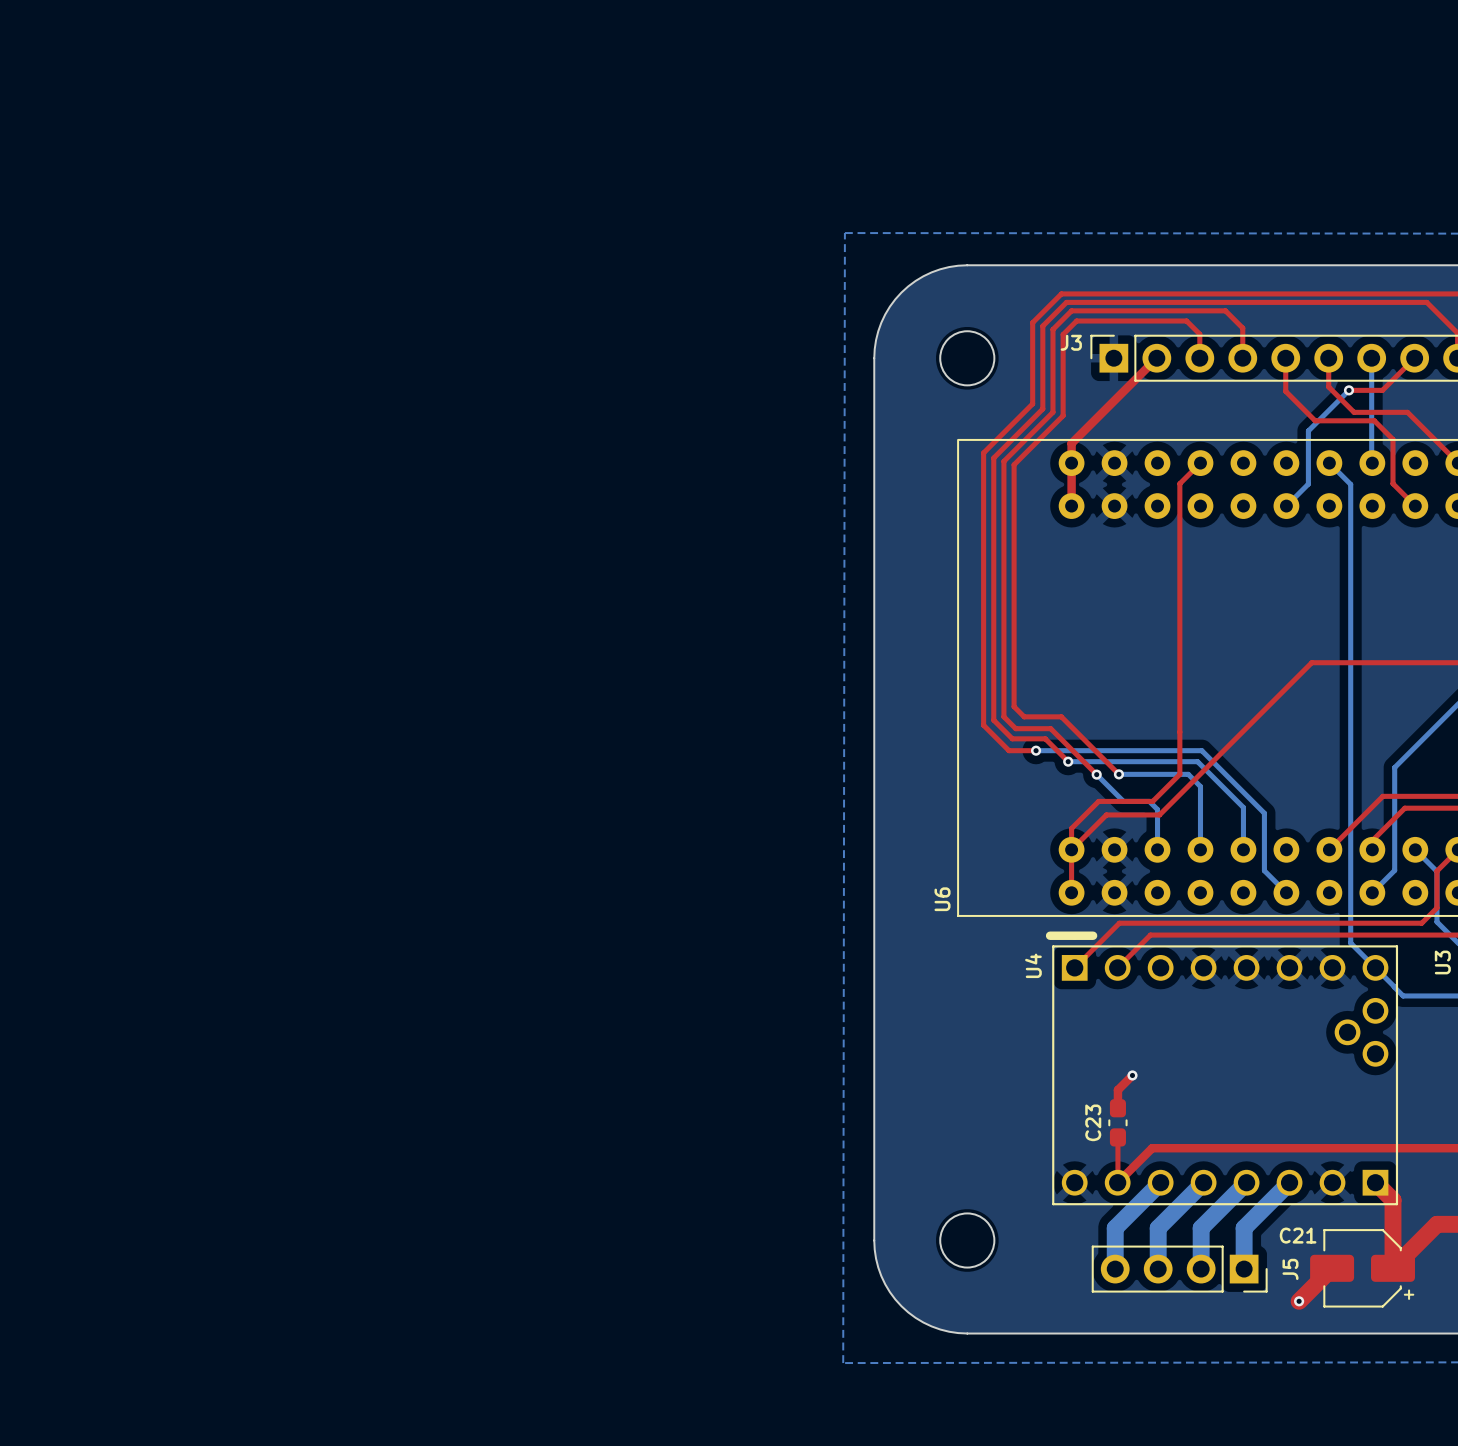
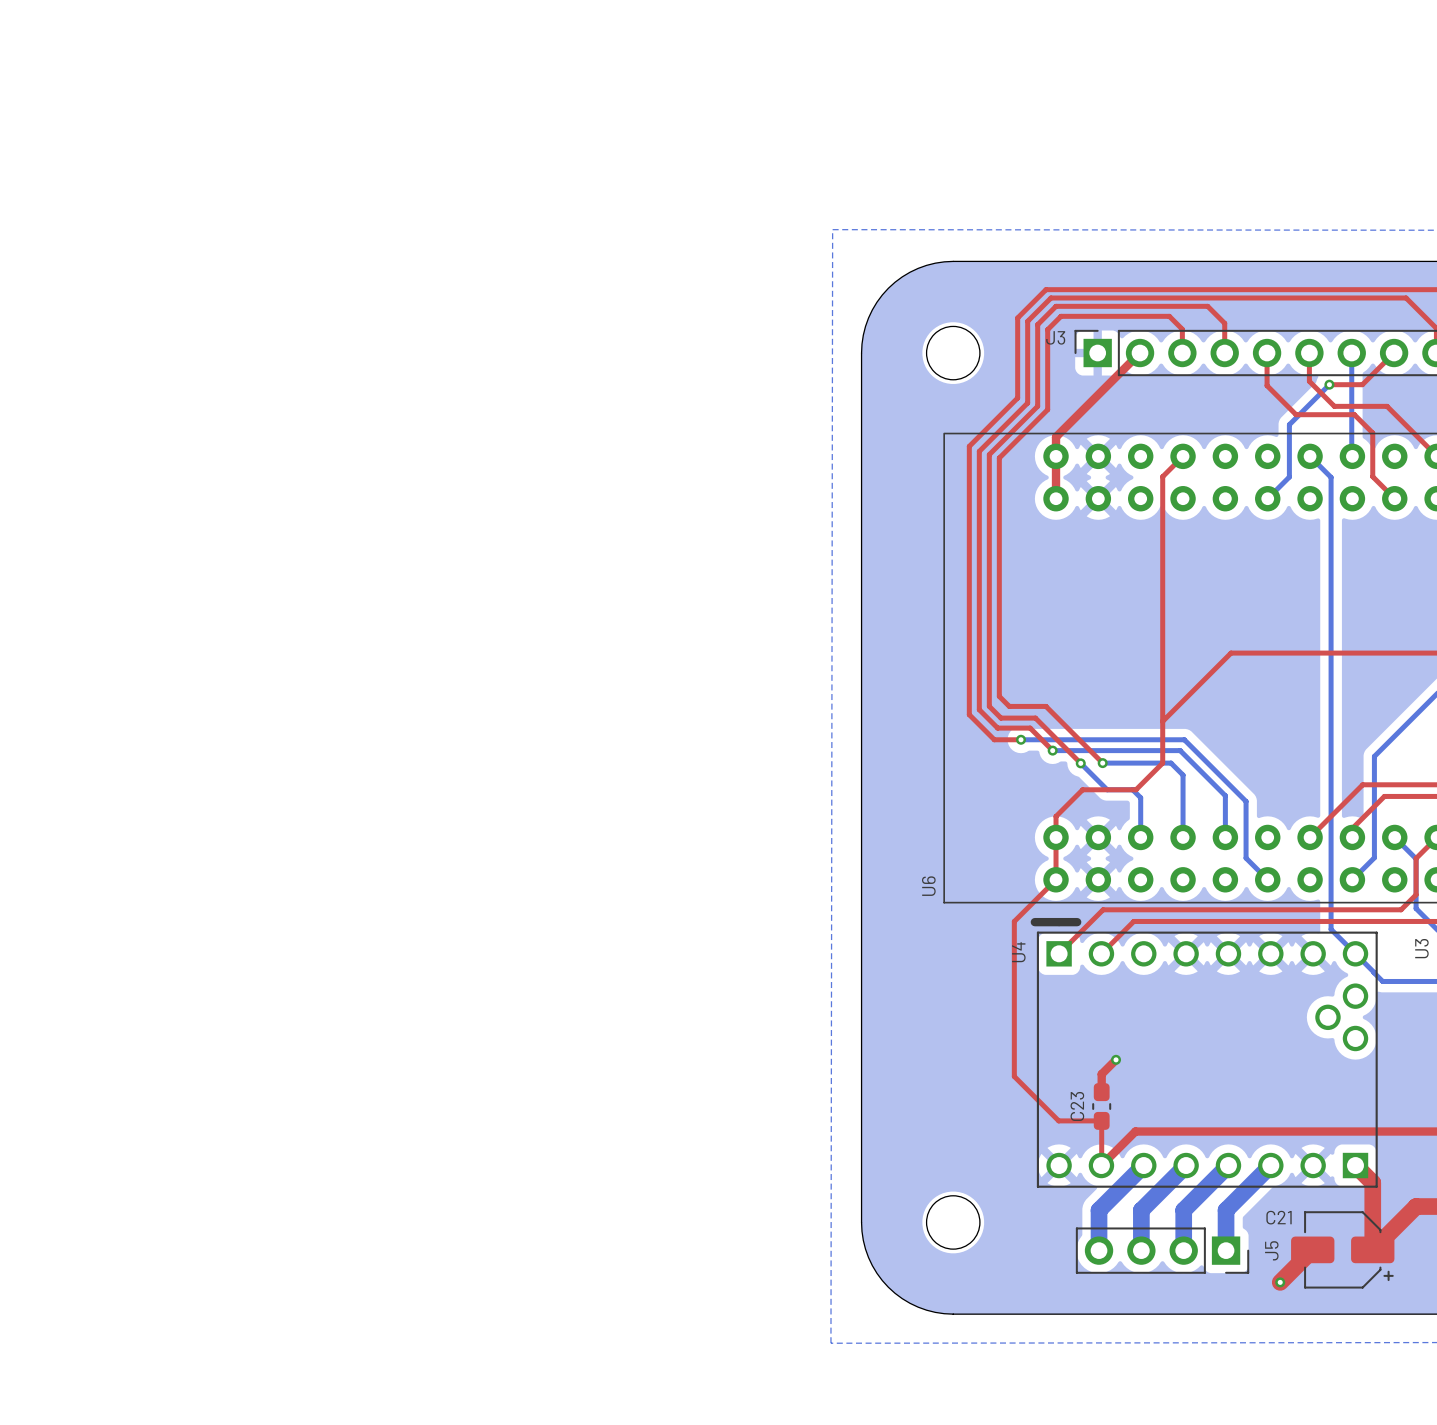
top track: (1311, 662) (1159, 814) (1106, 814) (1071, 849) -> (1292, 653) (1231, 653) (1162, 721)
top track: none -> (1056, 879) (1014, 921) (1014, 1076) (1058, 1120) (1101, 1120)

